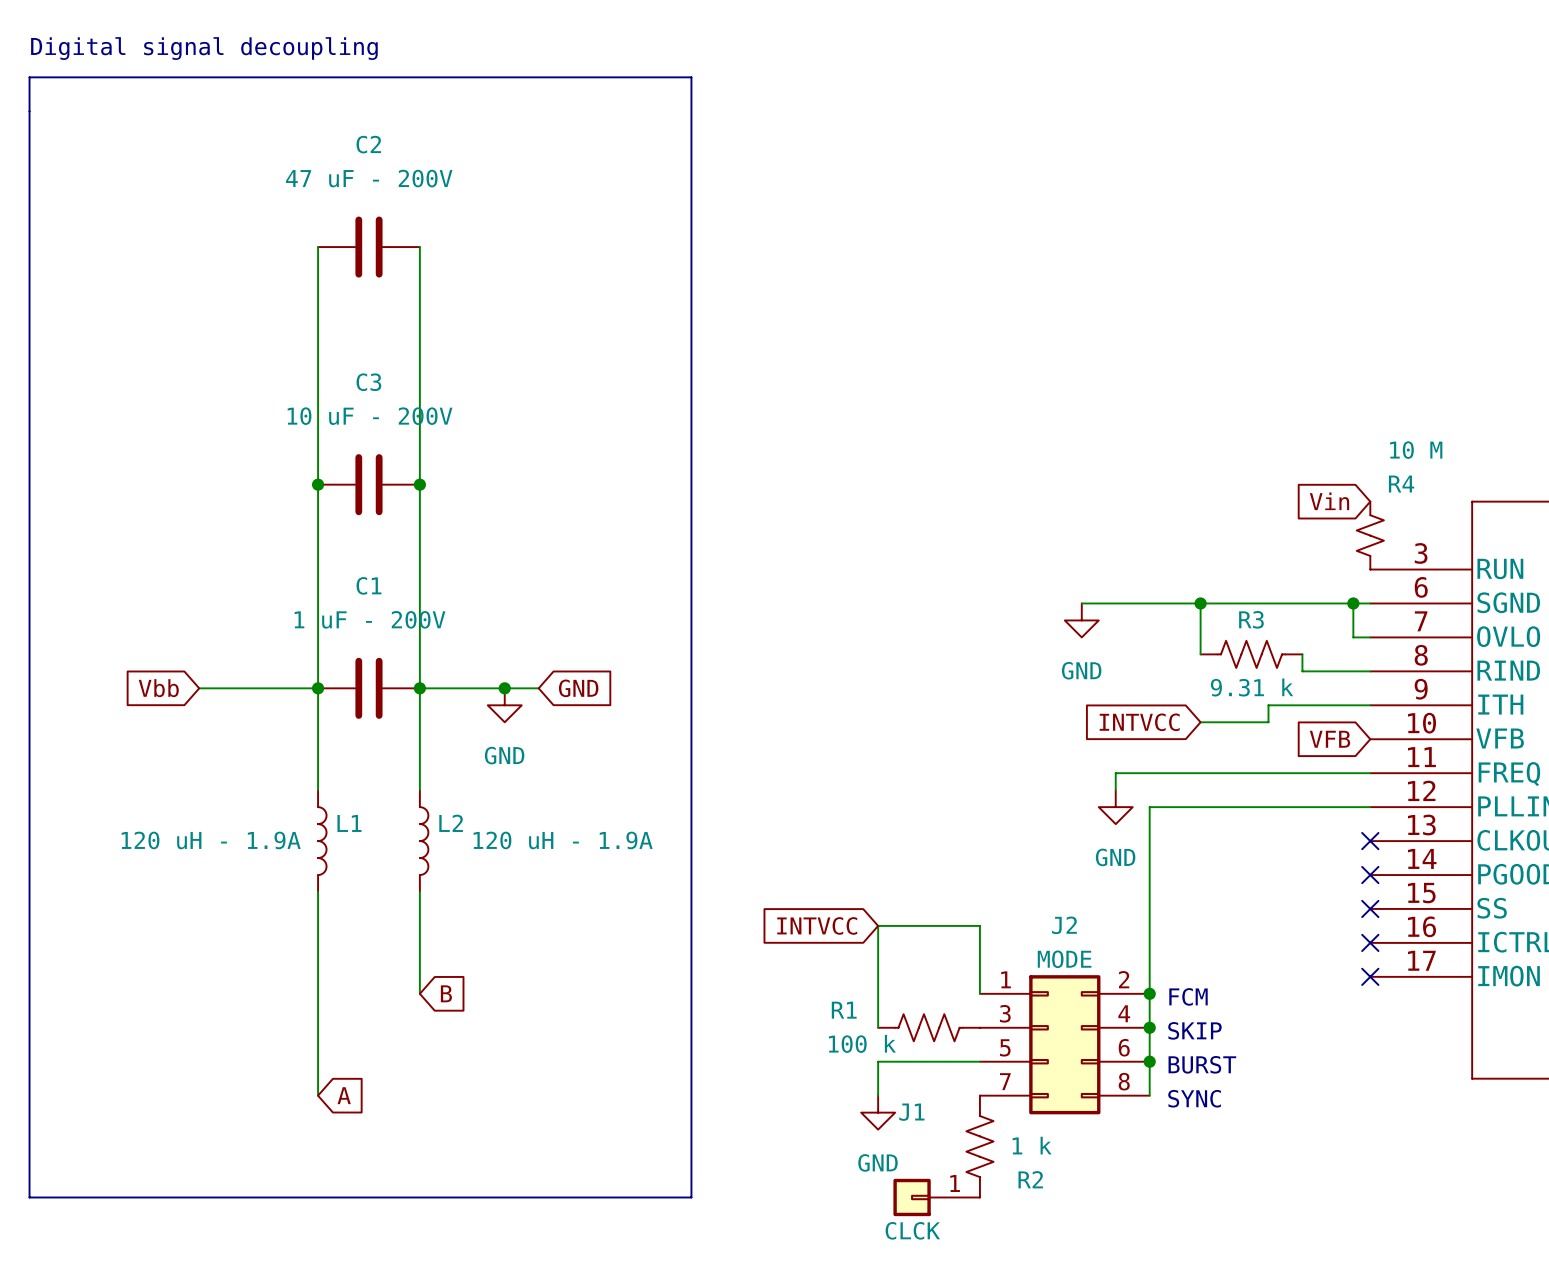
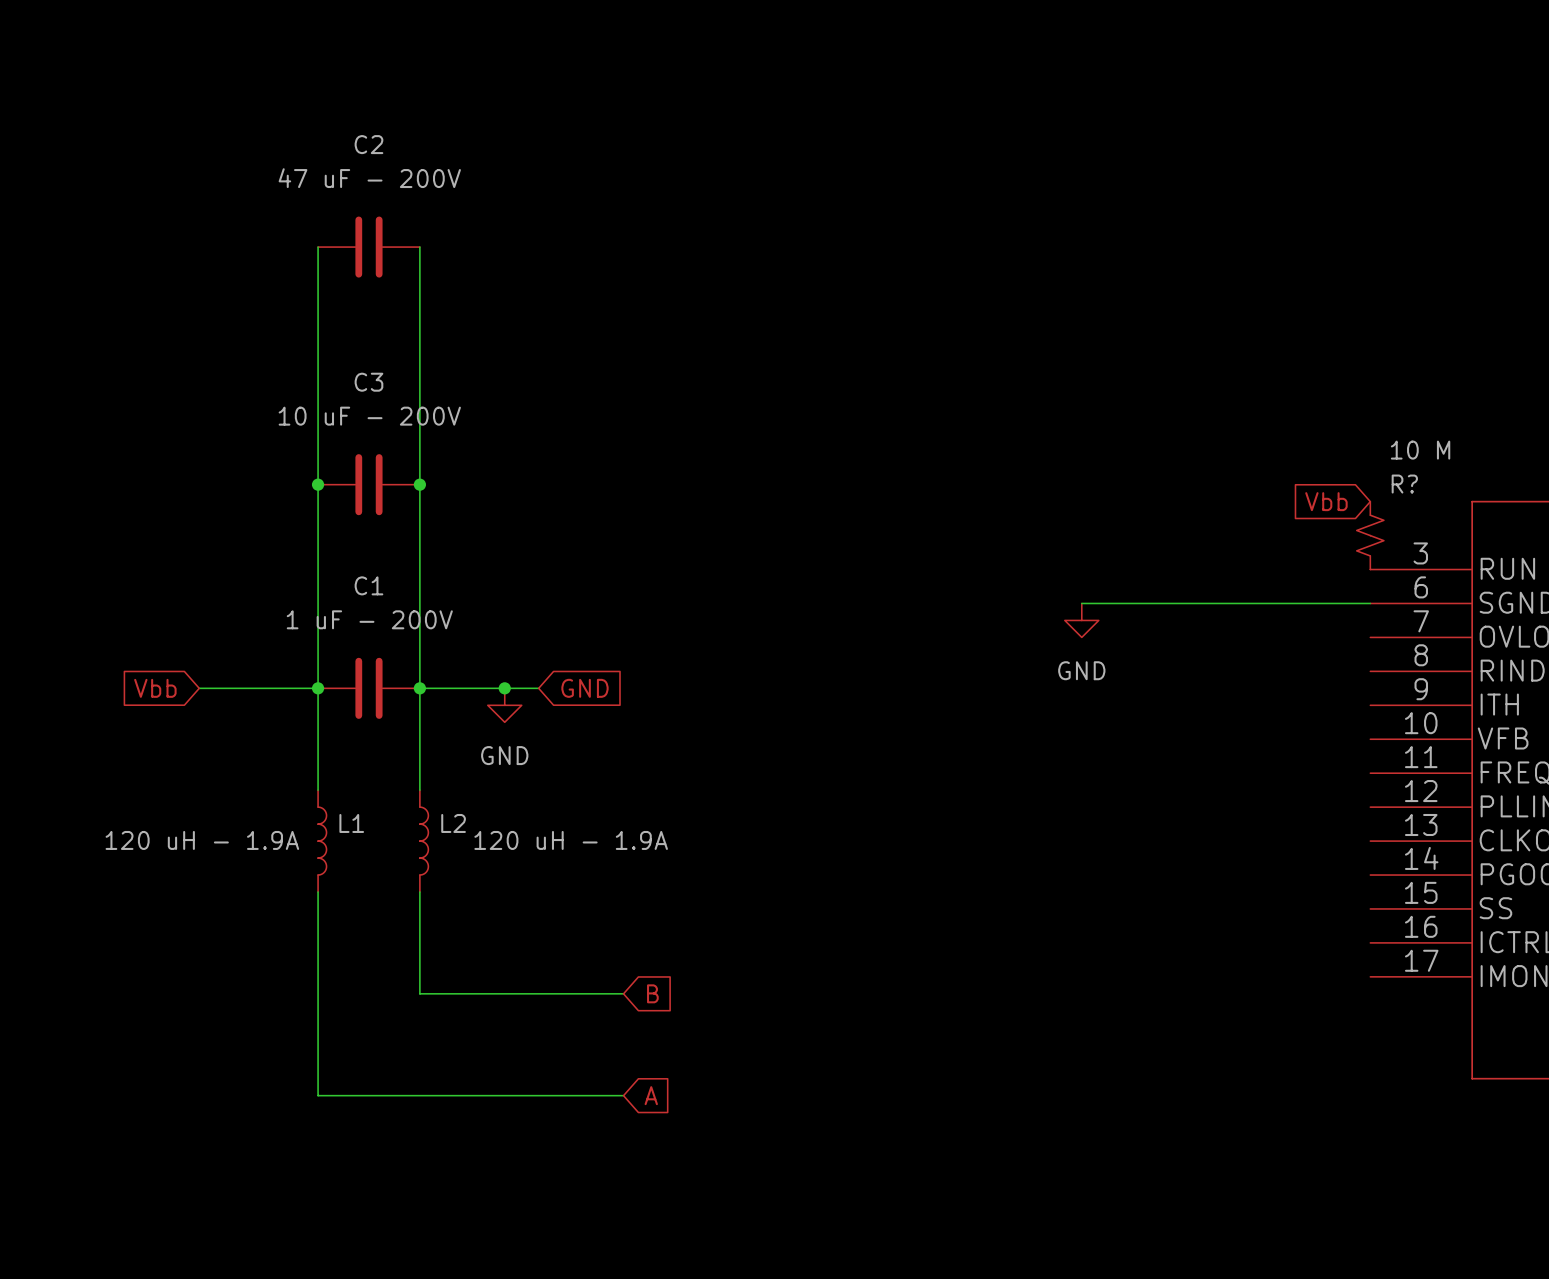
text: Digital signal decoupling (204, 48) -> none
line: (29, 77) (29, 1197) (691, 1197) (691, 77) (29, 77) -> none
R4 name: R4 (1401, 484) -> R? (1404, 484)
global label: Vin (1329, 501) -> Vbb (1326, 501)
wire: (1200, 603) (1200, 654) -> none
junction: (1200, 603) -> none
wire: (1353, 603) (1353, 637) (1370, 637) -> none
junction: (1353, 603) -> none
R3: 9.31 k (1251, 654) -> none
wire: (1302, 654) (1302, 671) (1370, 671) -> none
wire: (1370, 705) (1268, 705) (1268, 722) (1200, 722) -> none
global label: INTVCC (1139, 722) -> none
global label: VFB (1329, 739) -> none
wire: (1370, 773) (1115, 773) (1115, 790) -> none
power symbol: GND (1115, 807) -> none
wire: (1370, 807) (1149, 807) (1149, 1095) -> none
no-connect mark: (1370, 841) -> none
no-connect mark: (1370, 875) -> none
no-connect mark: (1370, 908) -> none
global label: INTVCC (817, 925) -> none
no-connect mark: (1370, 942) -> none
no-connect mark: (1370, 976) -> none
wire: none -> (419, 993) (623, 993)
global label position: B (446, 993) -> B (652, 993)
wire: (979, 993) (979, 925) (878, 925) (878, 1027) -> none
junction: (1149, 993) -> none
text: FCM (1188, 996) -> none
R1: 100 k (929, 1027) -> none
junction: (1149, 1027) -> none
text: SKIP (1194, 1030) -> none
J2: MODE (1064, 1044) -> none
wire: (979, 1061) (878, 1061) (878, 1095) -> none
junction: (1149, 1061) -> none
text: BURST (1202, 1064) -> none
wire: none -> (318, 1095) (623, 1095)
global label position: A (344, 1095) -> A (651, 1095)
text: SYNC (1194, 1098) -> none
power symbol: GND (878, 1112) -> none
R2: 1 k (979, 1146) -> none
J1: CLCK (936, 1197) -> none

